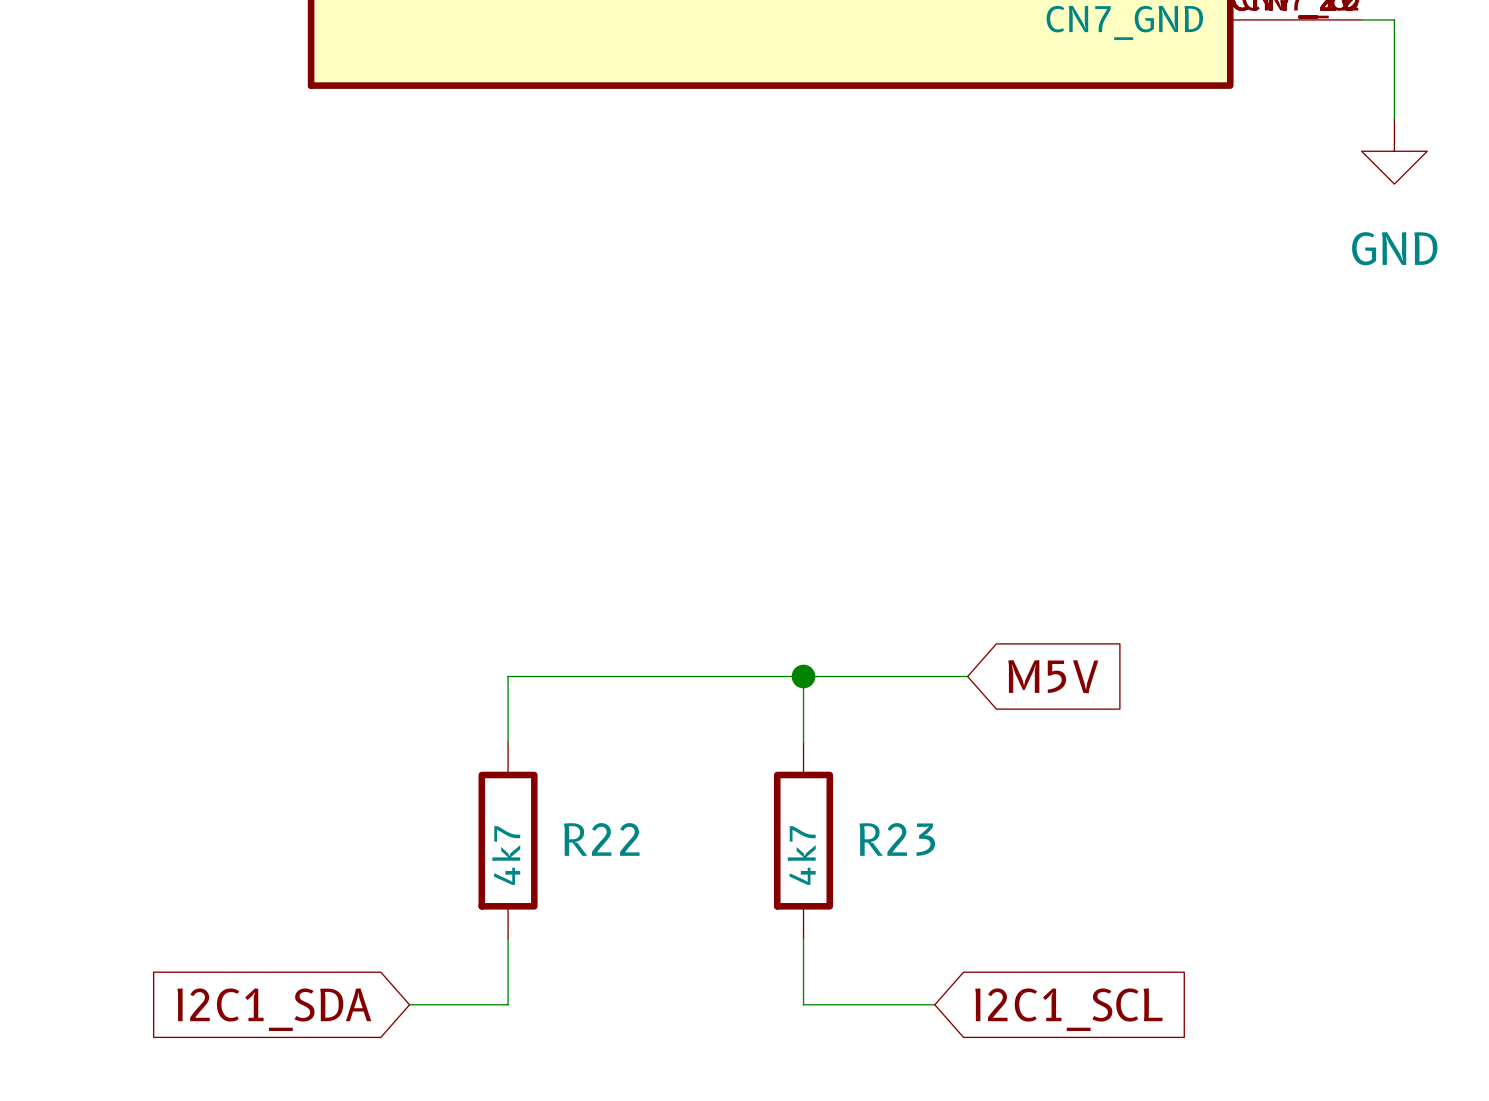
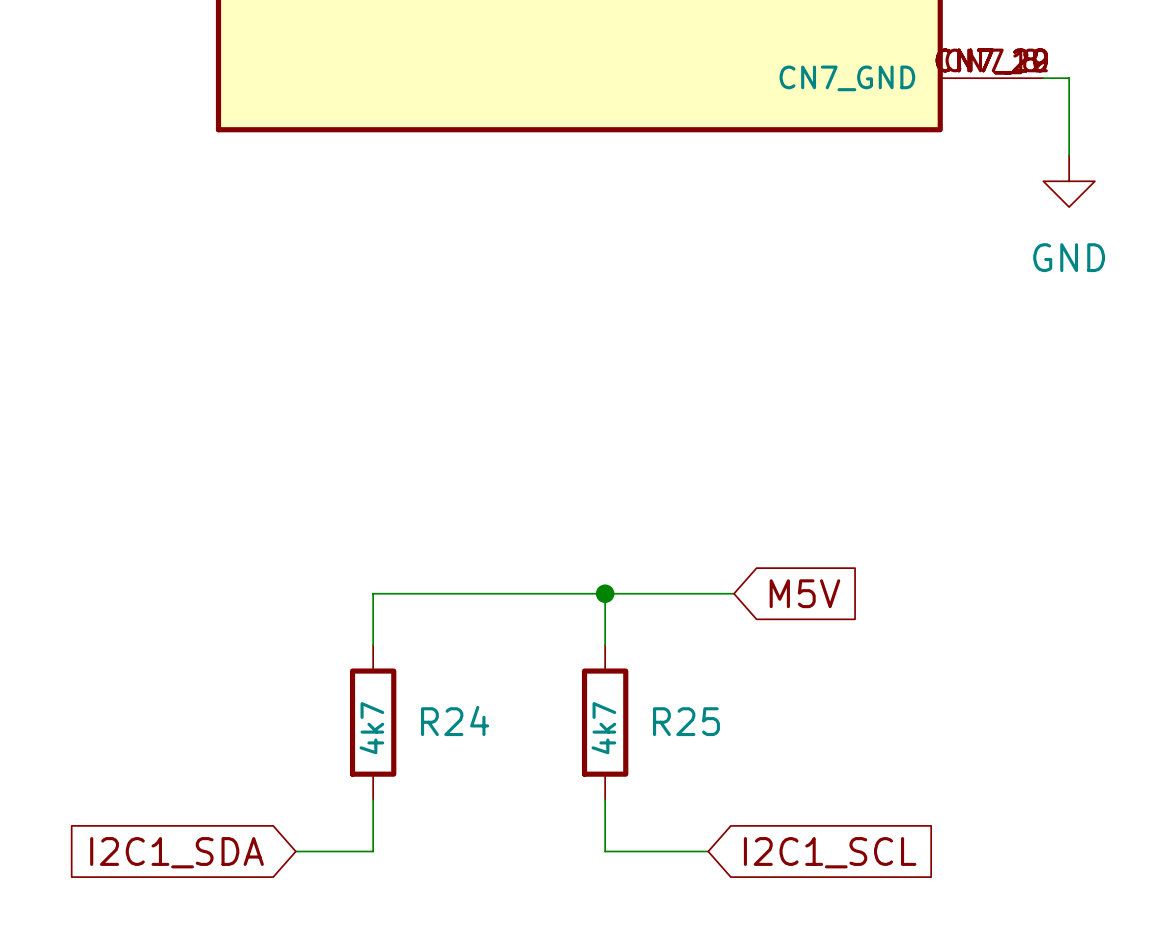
R22 name: R22 (601, 839) -> R24 (455, 721)
R23 name: R23 (897, 839) -> R25 (686, 721)

